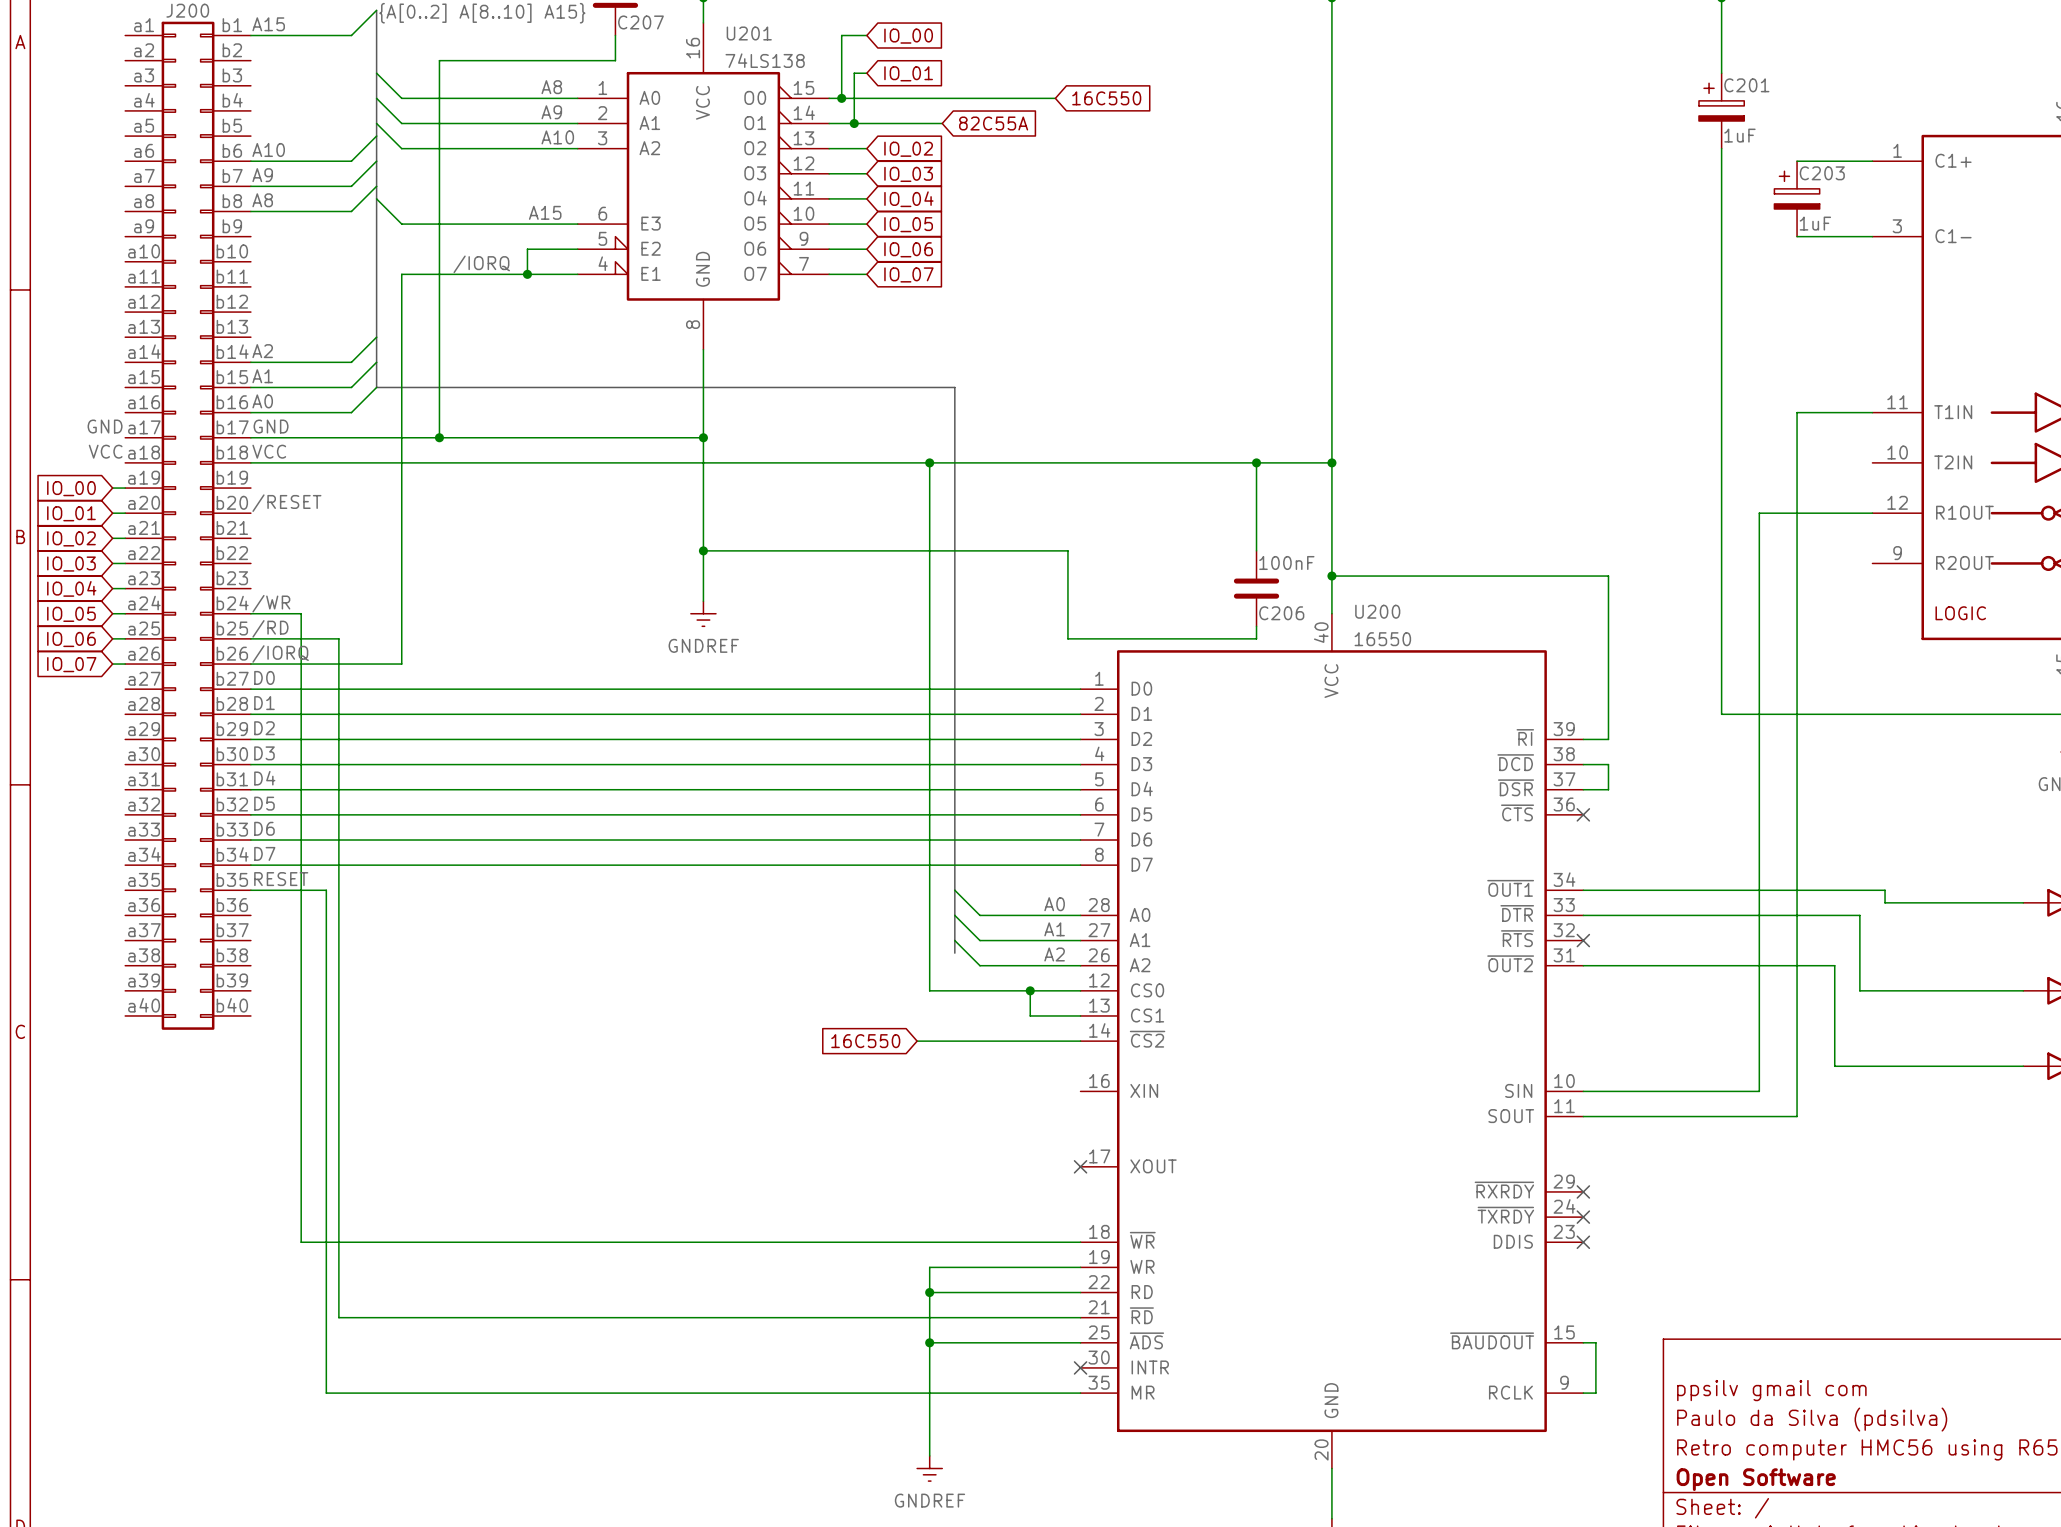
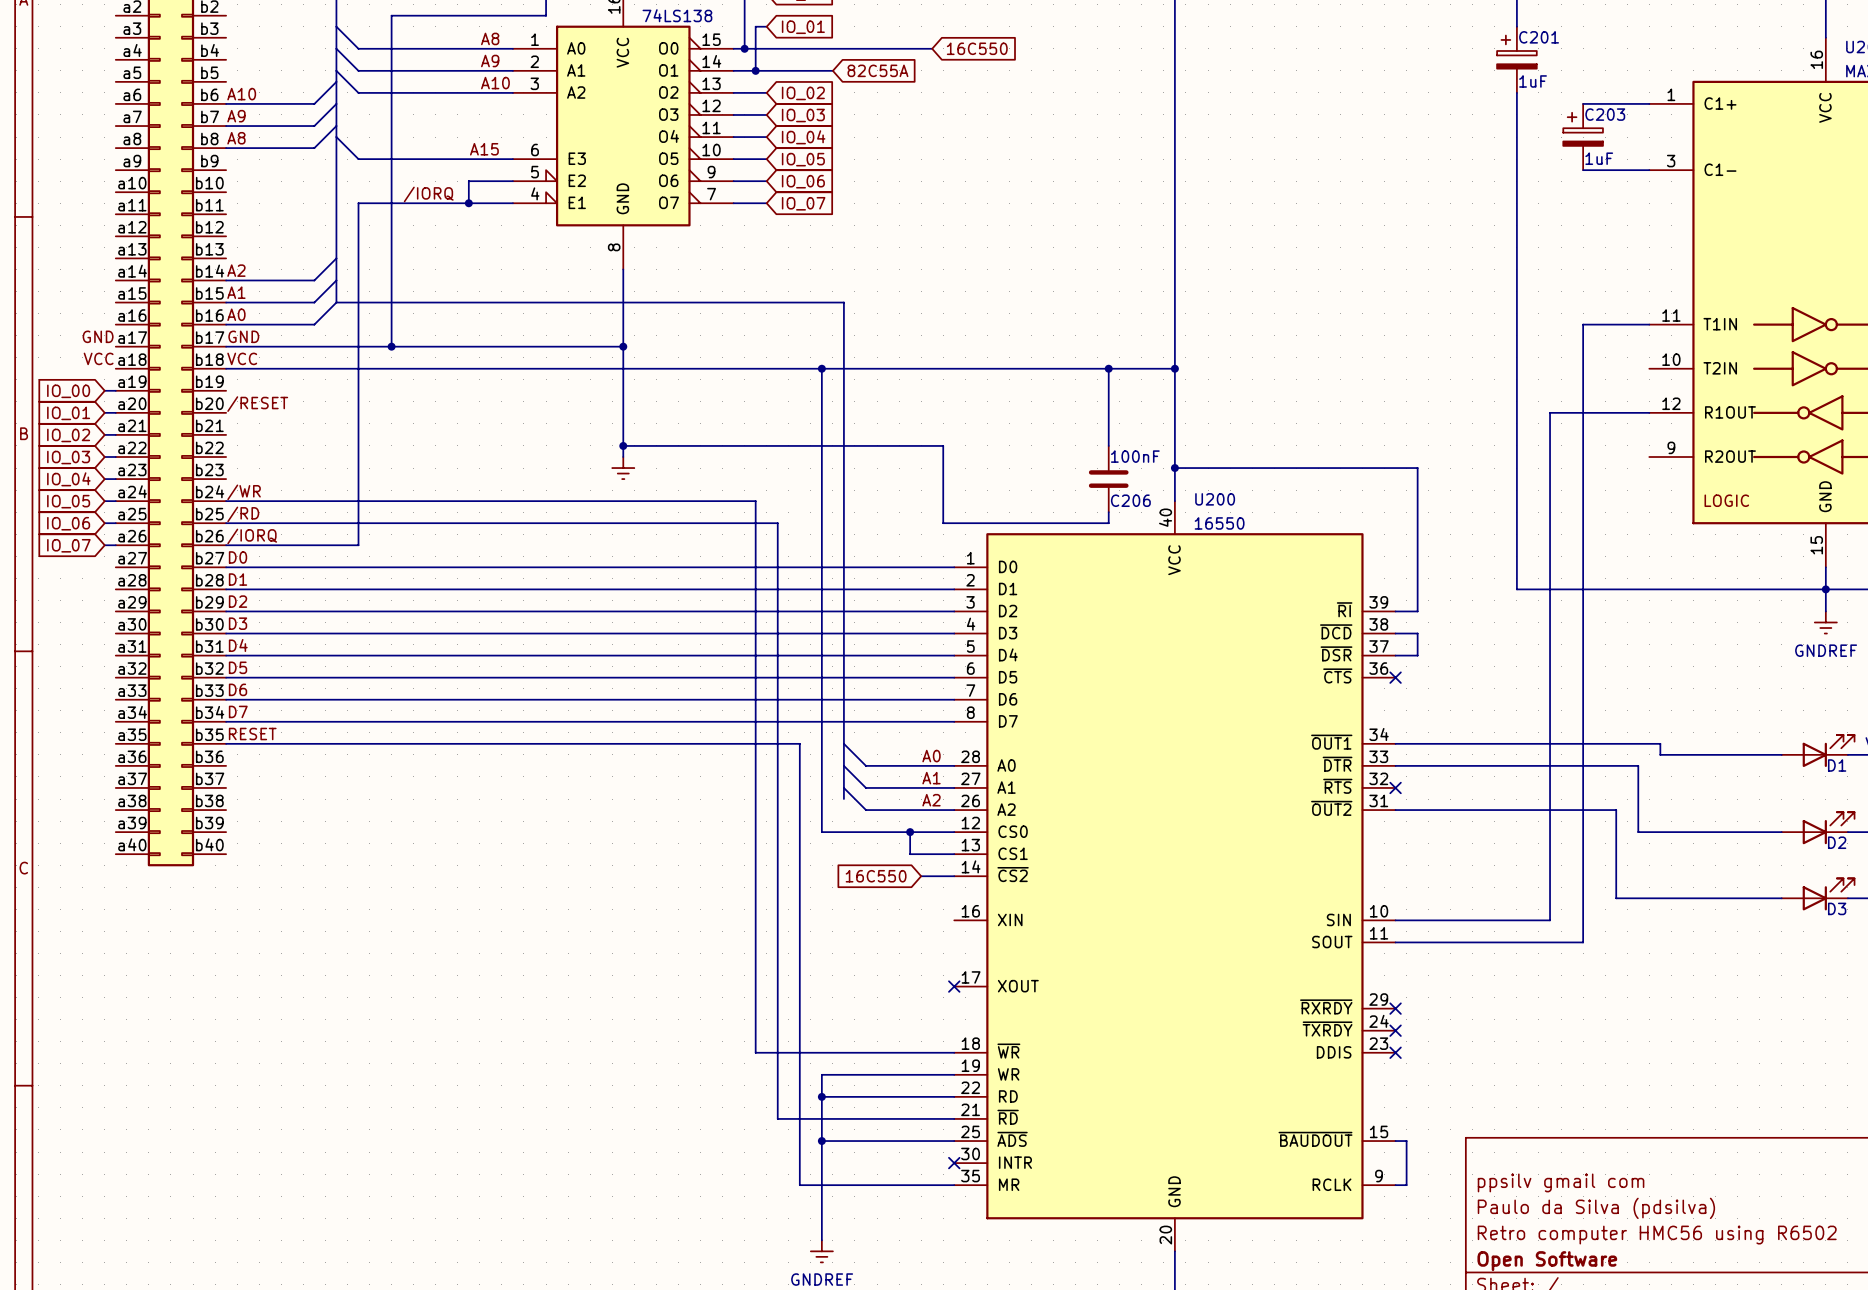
wire: (703, 563) (703, 601) -> none
power symbol: none -> (623, 468)
wire: (301, 613) (301, 1242) (854, 1242) -> (270, 501) (755, 501) (755, 1052)
power symbol: GNDREF (703, 613) -> none
wire: (338, 638) (338, 1317) (879, 1317) -> (303, 523) (777, 523) (777, 1118)
wire: (326, 890) (326, 1393) (904, 1393) -> (292, 743) (799, 743) (799, 1185)
global label position: 16C550 (865, 1041) -> 16C550 (876, 876)
wire: (917, 1041) (1042, 1041) -> none

